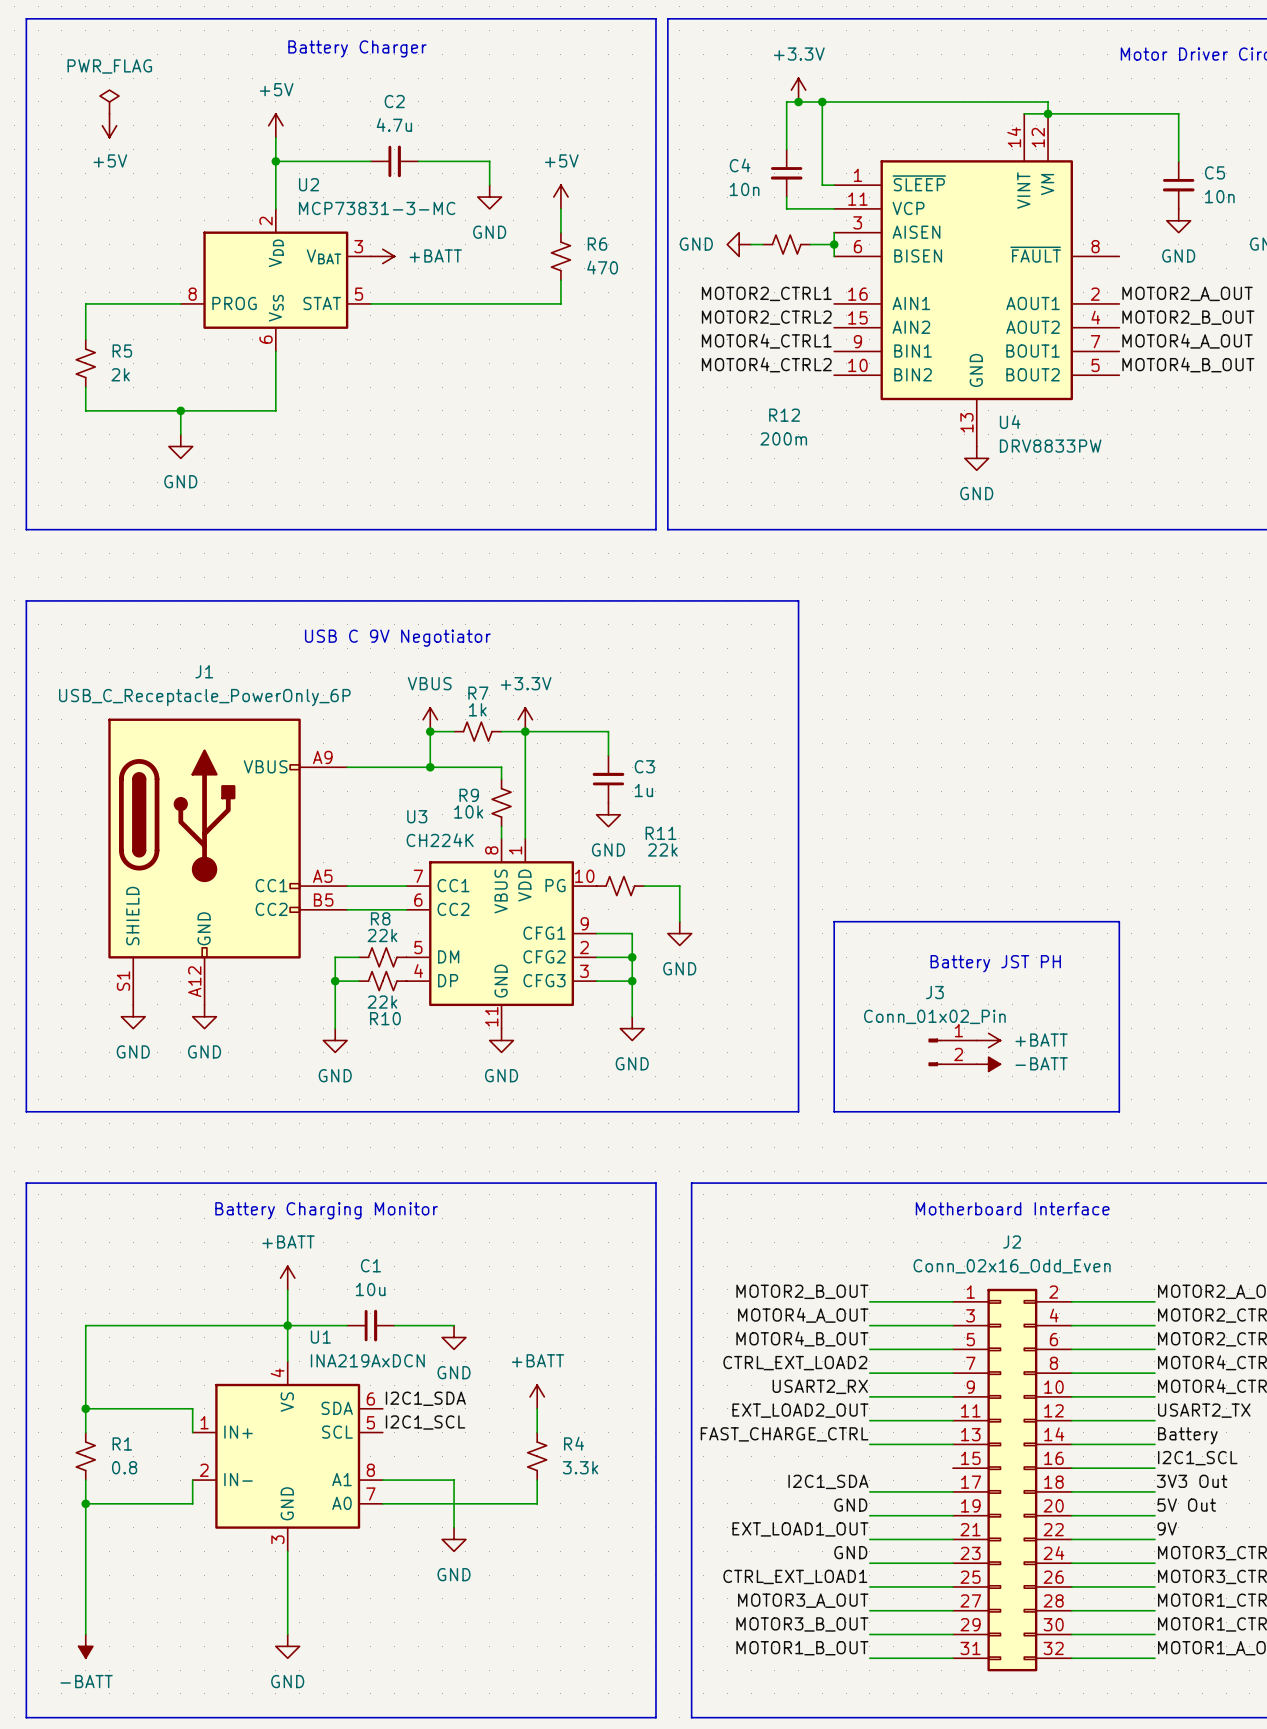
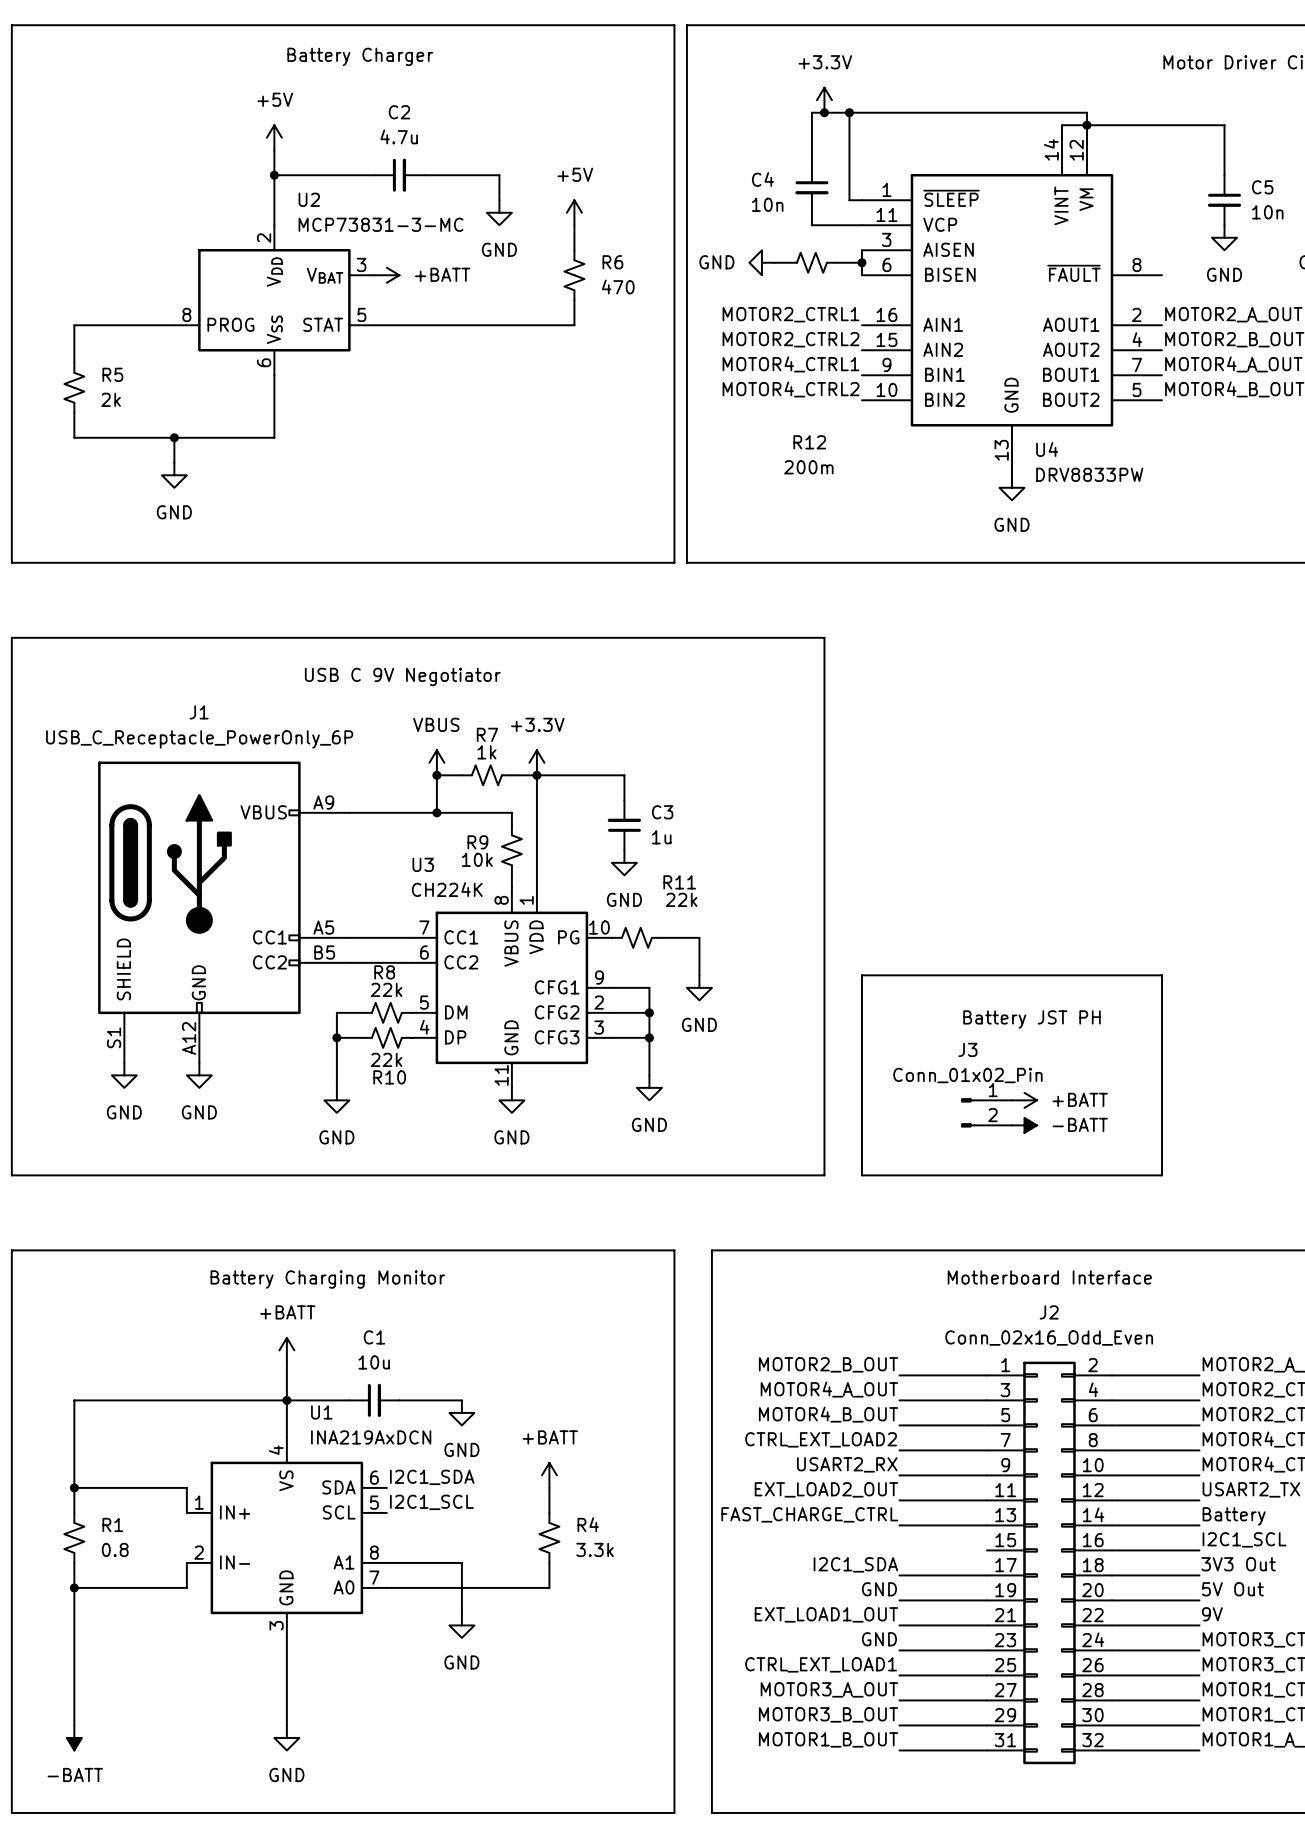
power symbol: PWR_FLAG (109, 101) -> none
power symbol: +5V (109, 125) -> none

